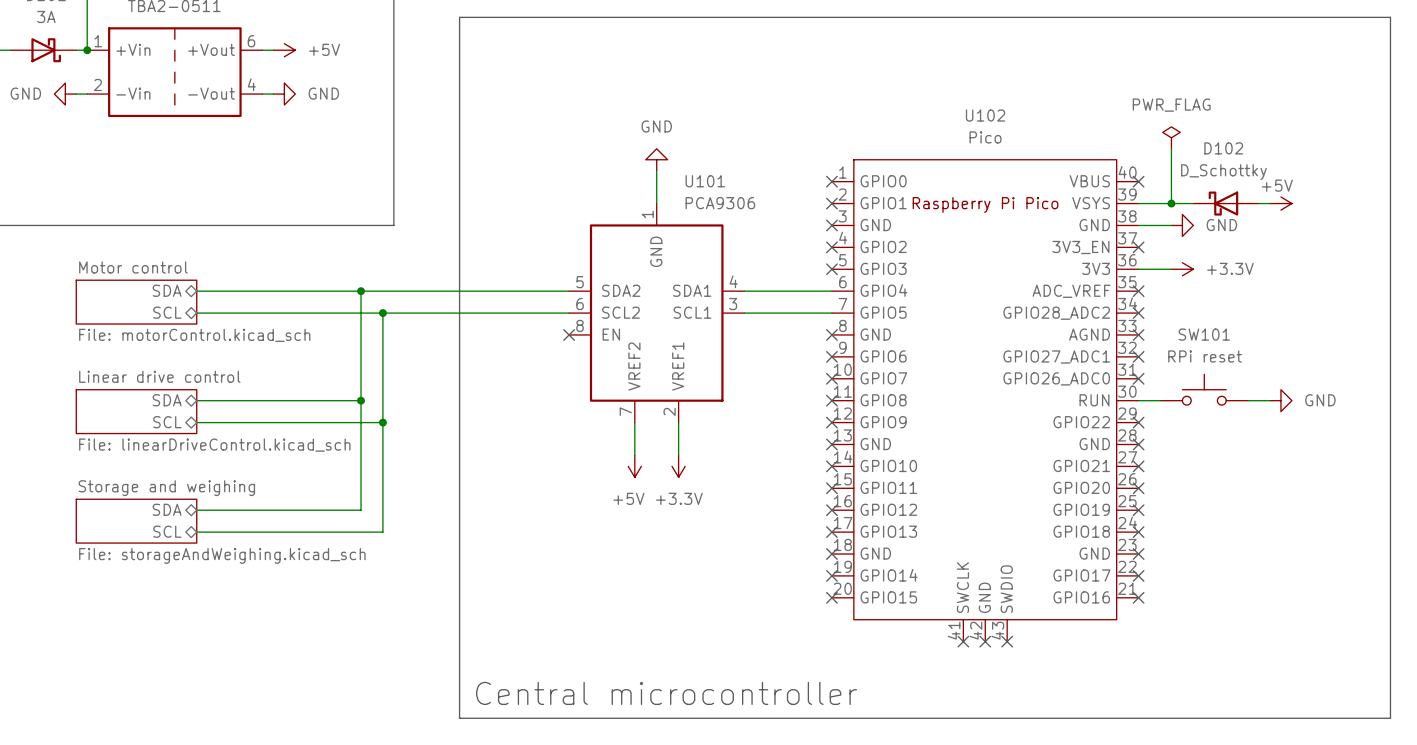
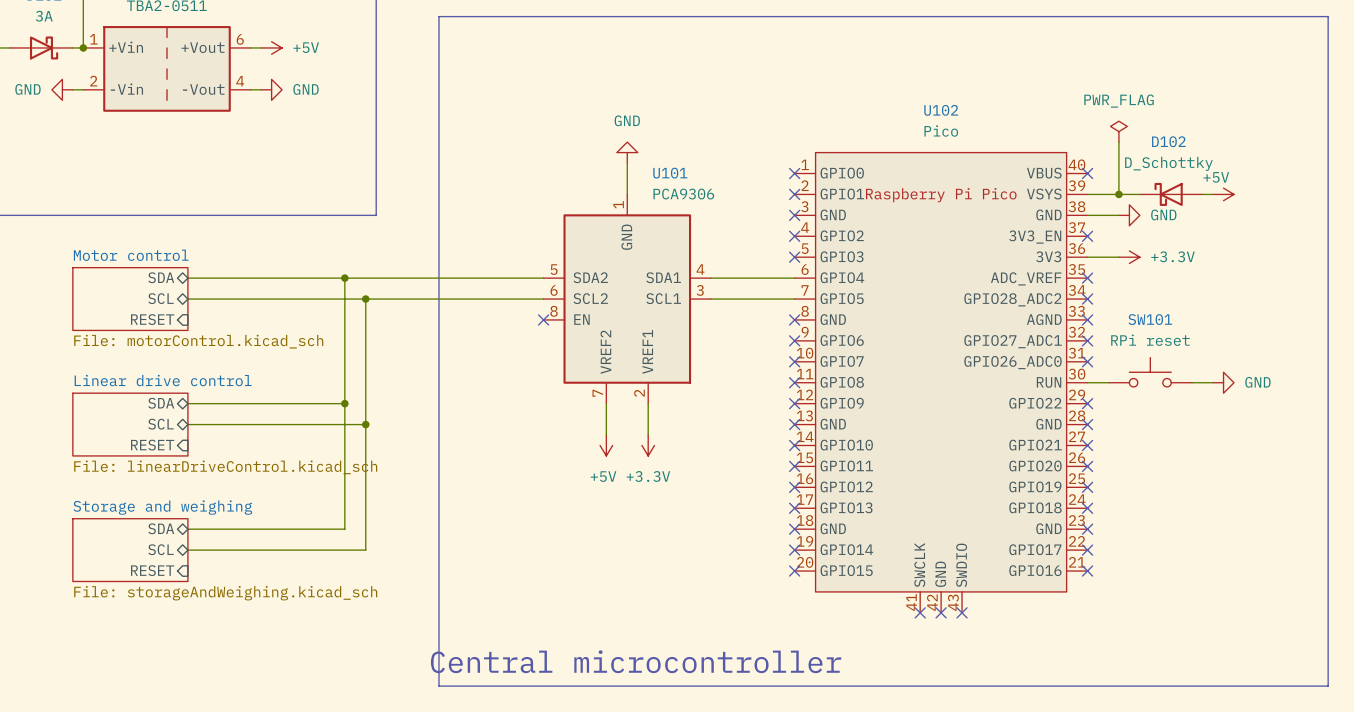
sheet Motor control: File: motorControl.kicad_sch (136, 302) -> none
sheet Motor control: none -> File: motorControl.kicad_sch (130, 299)
sheet pin: none -> RESET (152, 319)
sheet pin: SDA (167, 400) -> none
wire: (196, 400) (361, 400) -> none
junction: (361, 400) -> none
sheet Linear drive control: File: linearDriveControl.kicad_sch (136, 411) -> none
sheet pin: SCL (167, 422) -> SDA (161, 403)
wire: (361, 422) (382, 422) -> none
junction: none -> (344, 403)
junction: (382, 422) -> none
sheet Linear drive control: none -> File: linearDriveControl.kicad_sch (130, 424)
sheet pin: none -> SCL (161, 424)
wire: none -> (187, 424) (365, 424)
junction: none -> (365, 424)
sheet pin: none -> RESET (152, 445)
sheet pin position: SDA (167, 509) -> SDA (161, 528)
wire: (196, 510) (361, 510) -> (187, 529) (344, 529) (344, 487)
sheet Storage and weighing: File: storageAndWeighing.kicad_sch (136, 521) -> none
sheet pin: SCL (167, 531) -> none
wire: (196, 532) (382, 532) -> (187, 550) (365, 550) (365, 508)
sheet Storage and weighing: none -> File: storageAndWeighing.kicad_sch (130, 550)
sheet pin: none -> SCL (161, 549)
sheet pin: none -> RESET (152, 570)

